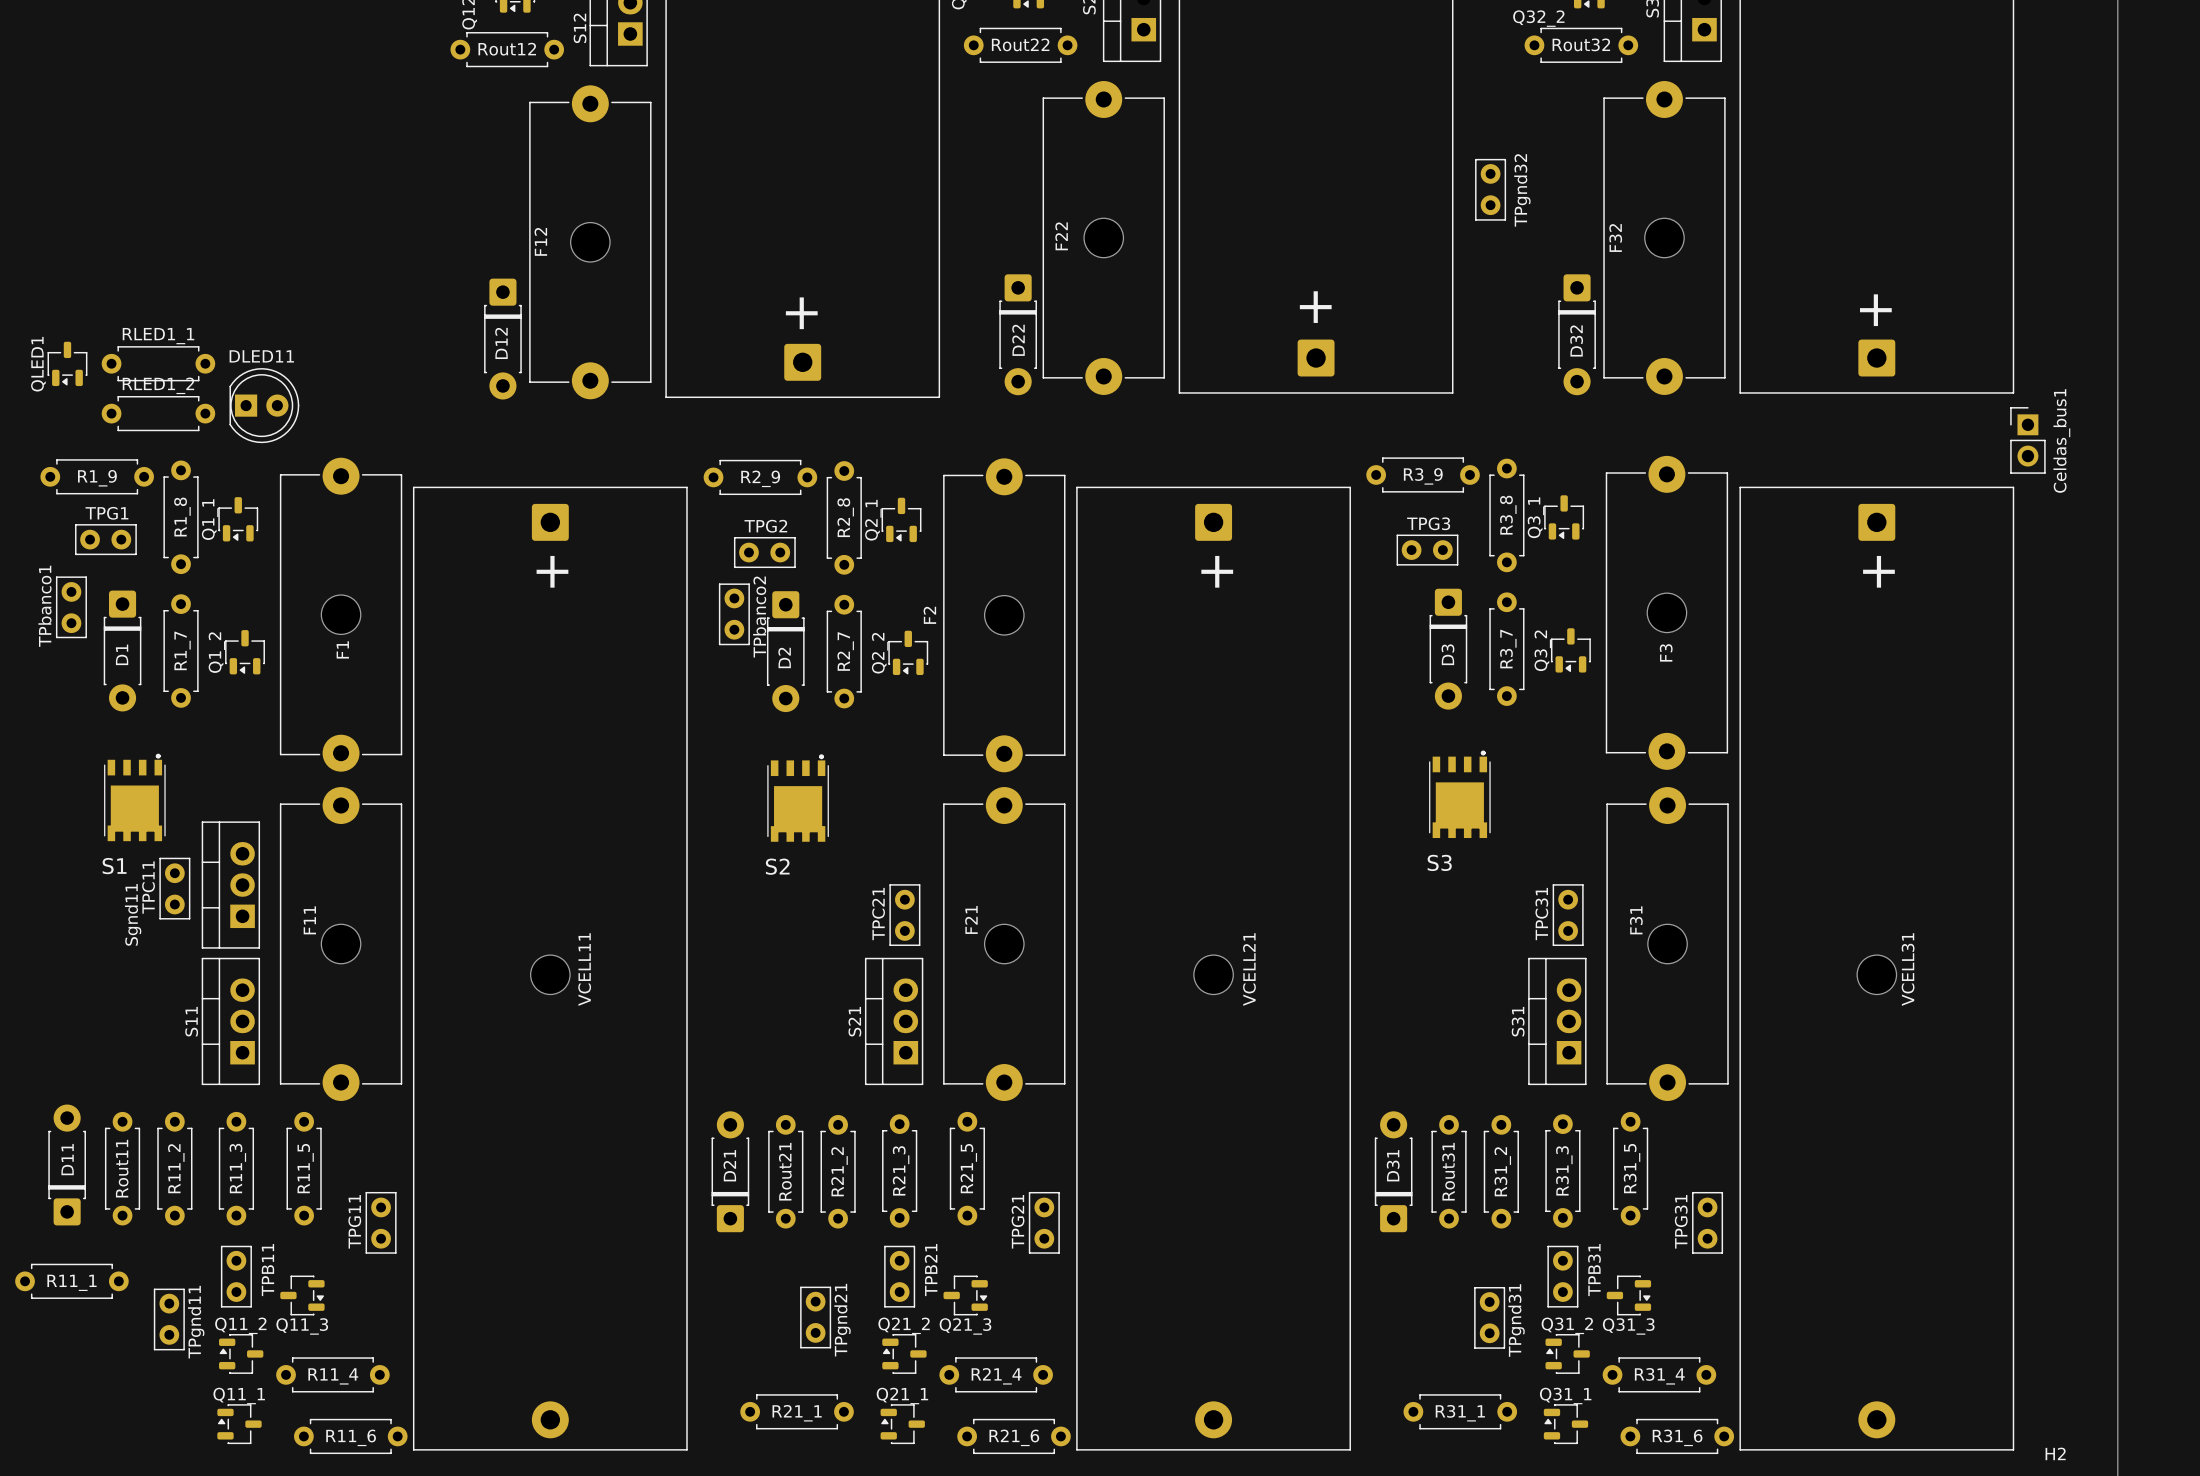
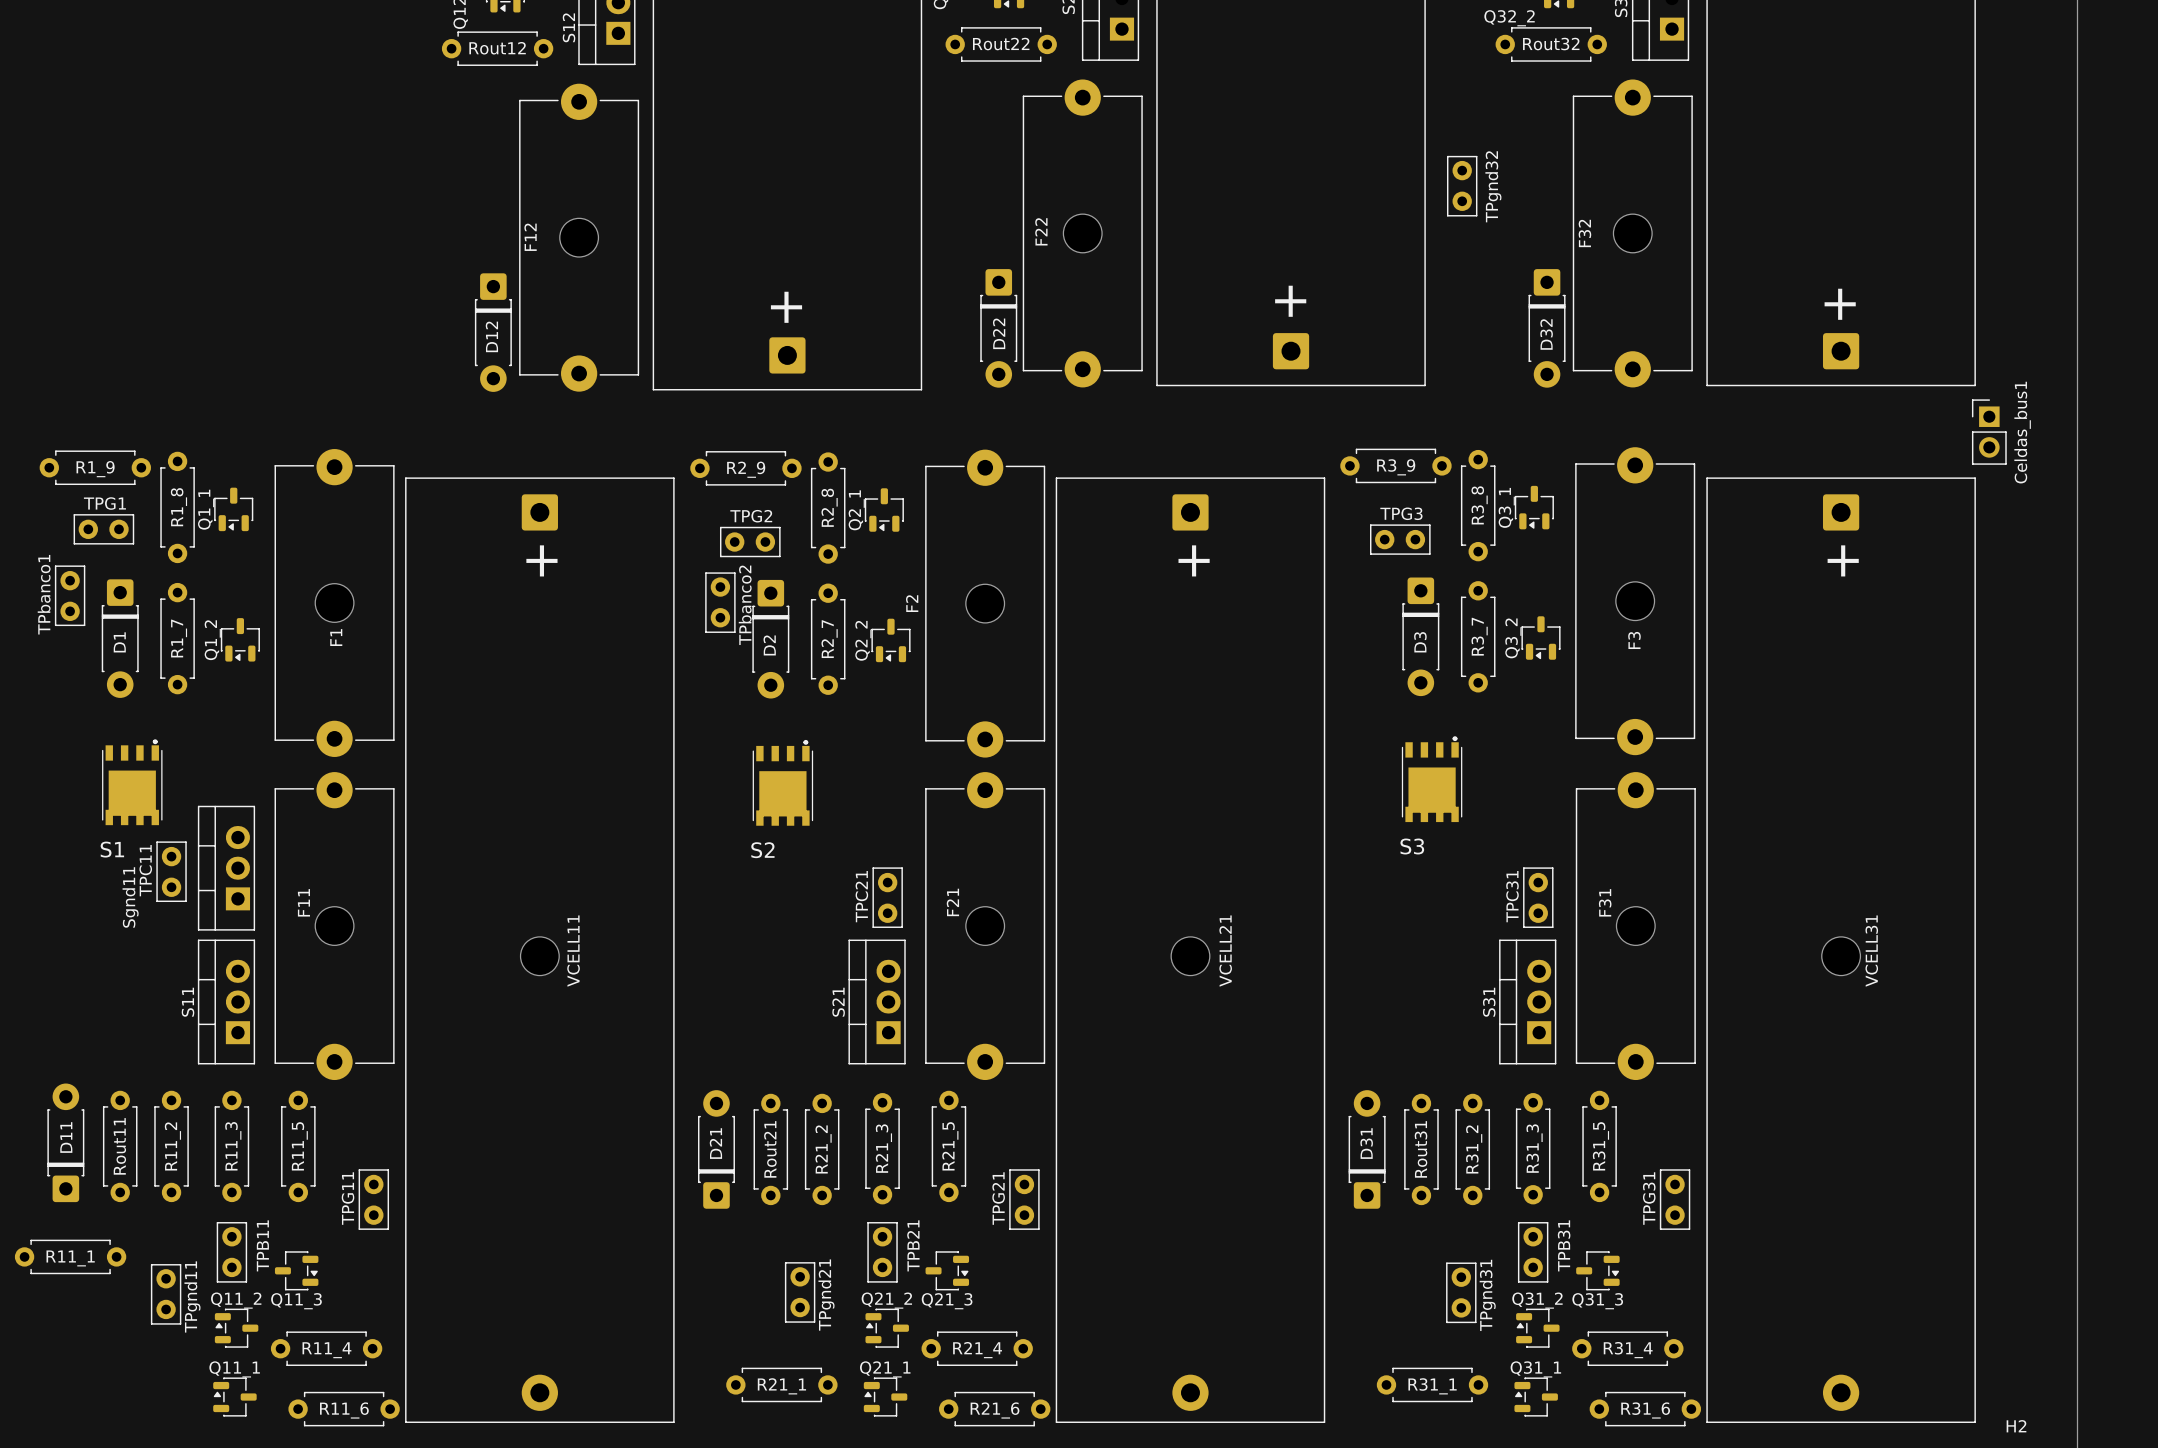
QLED1: (67, 363) -> none
RLED1_1: (158, 363) -> none
DLED11: (264, 405) -> none
RLED1_2: (158, 413) -> none

